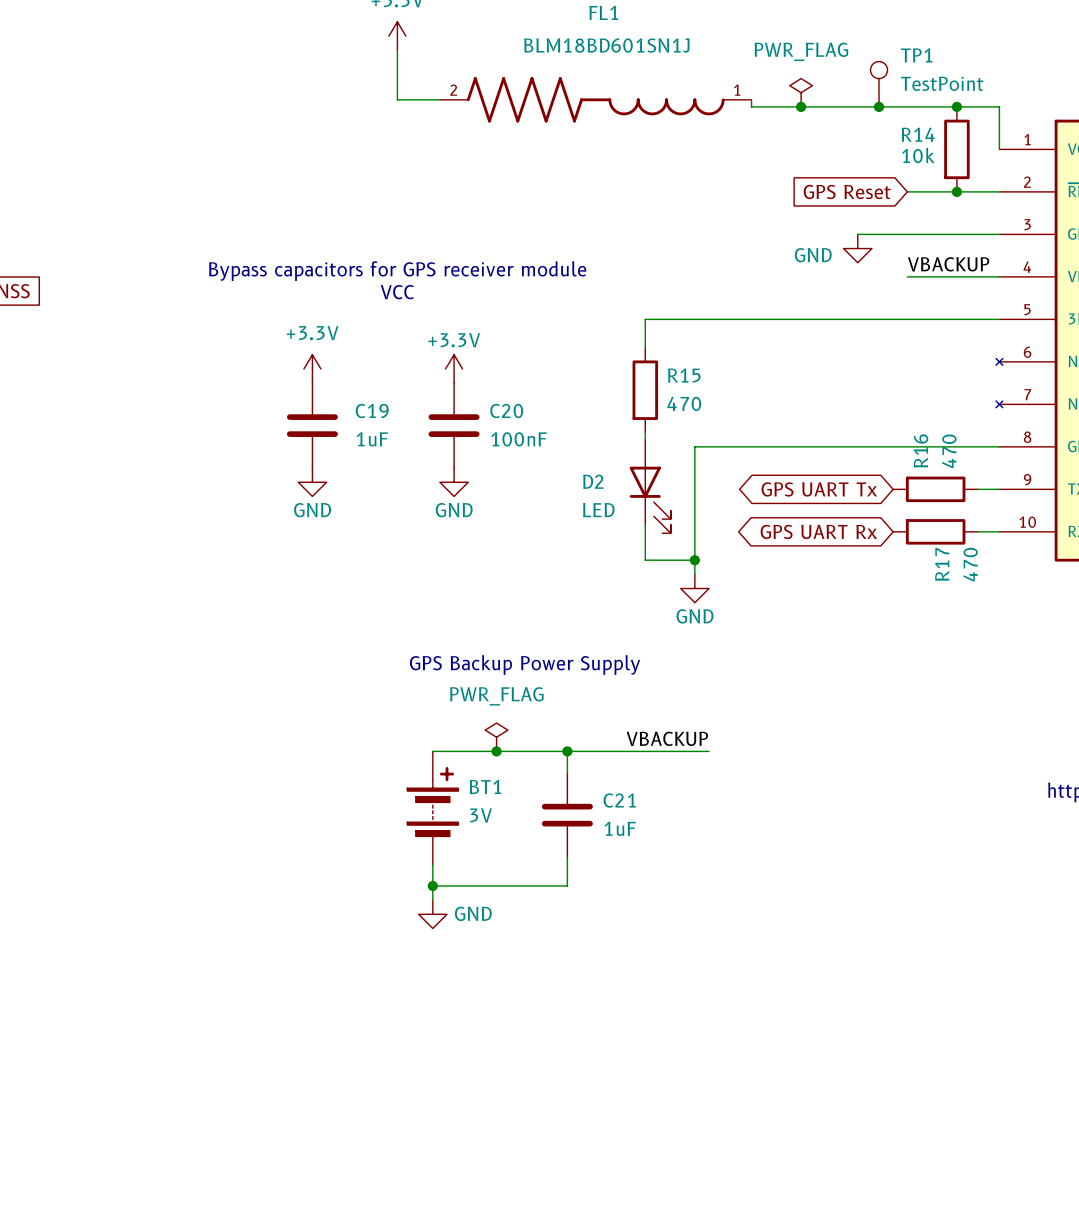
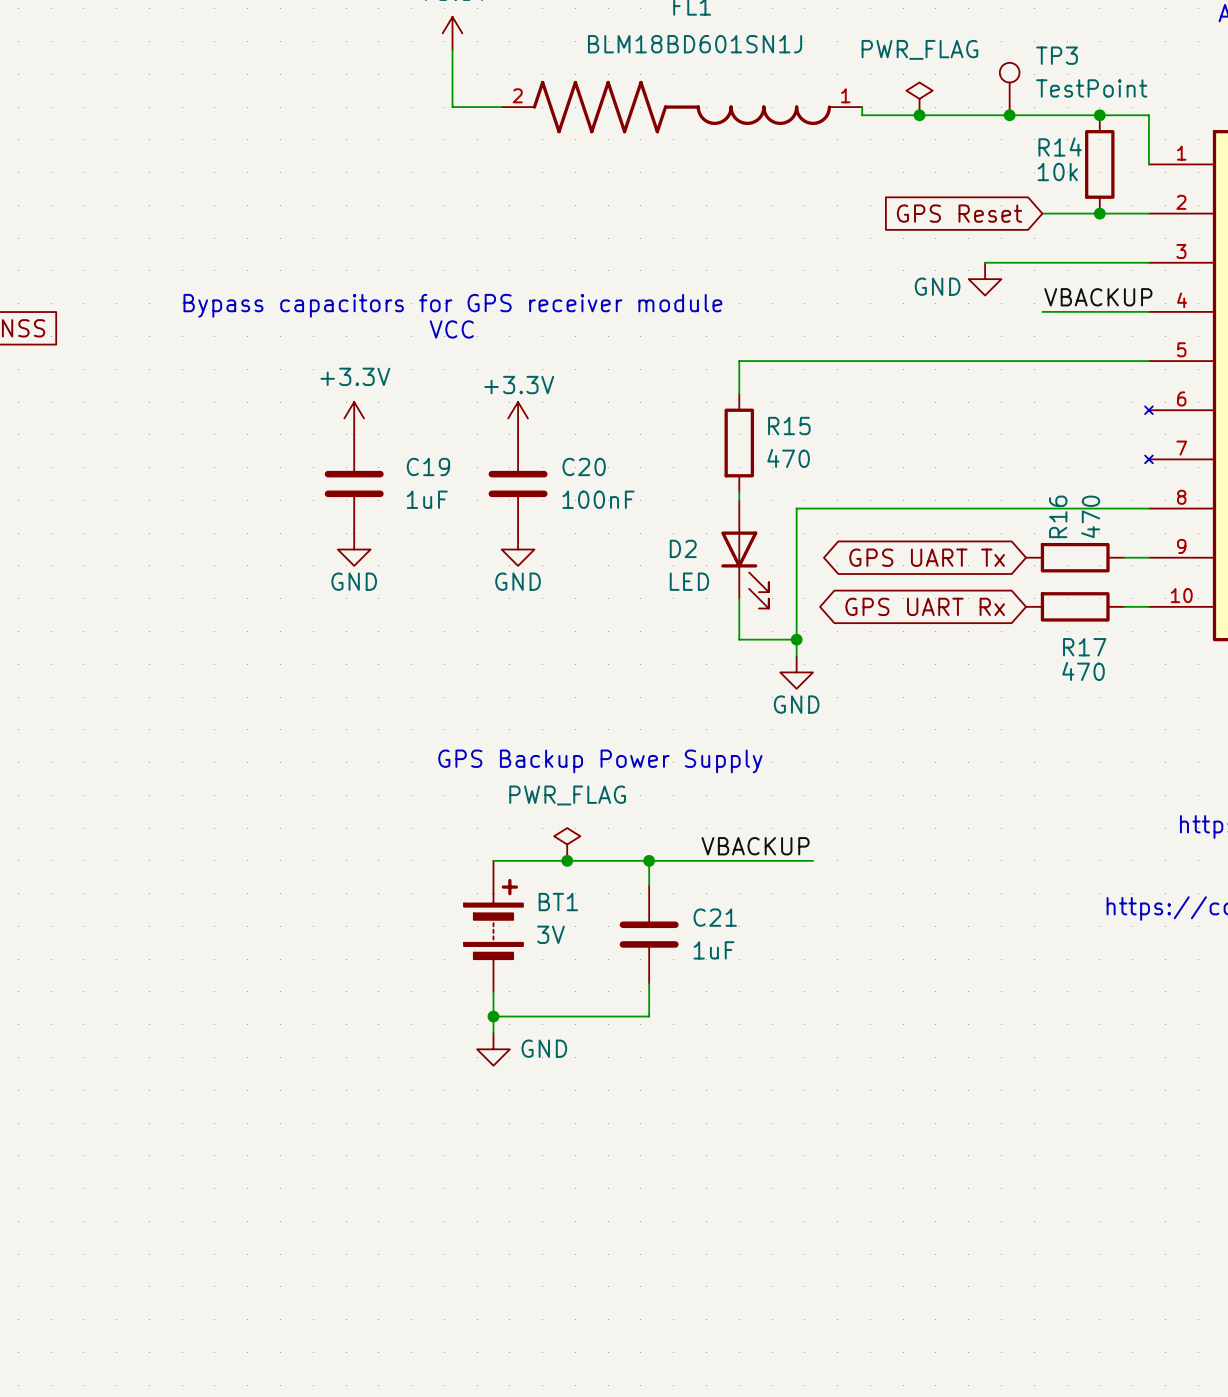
TP1 name: TP1 (916, 55) -> TP3 (1056, 55)
R17 name rotation: 0° (942, 564) -> 90° clockwise (1084, 647)
R17 value rotation: 0° (970, 564) -> 90° clockwise (1083, 671)

